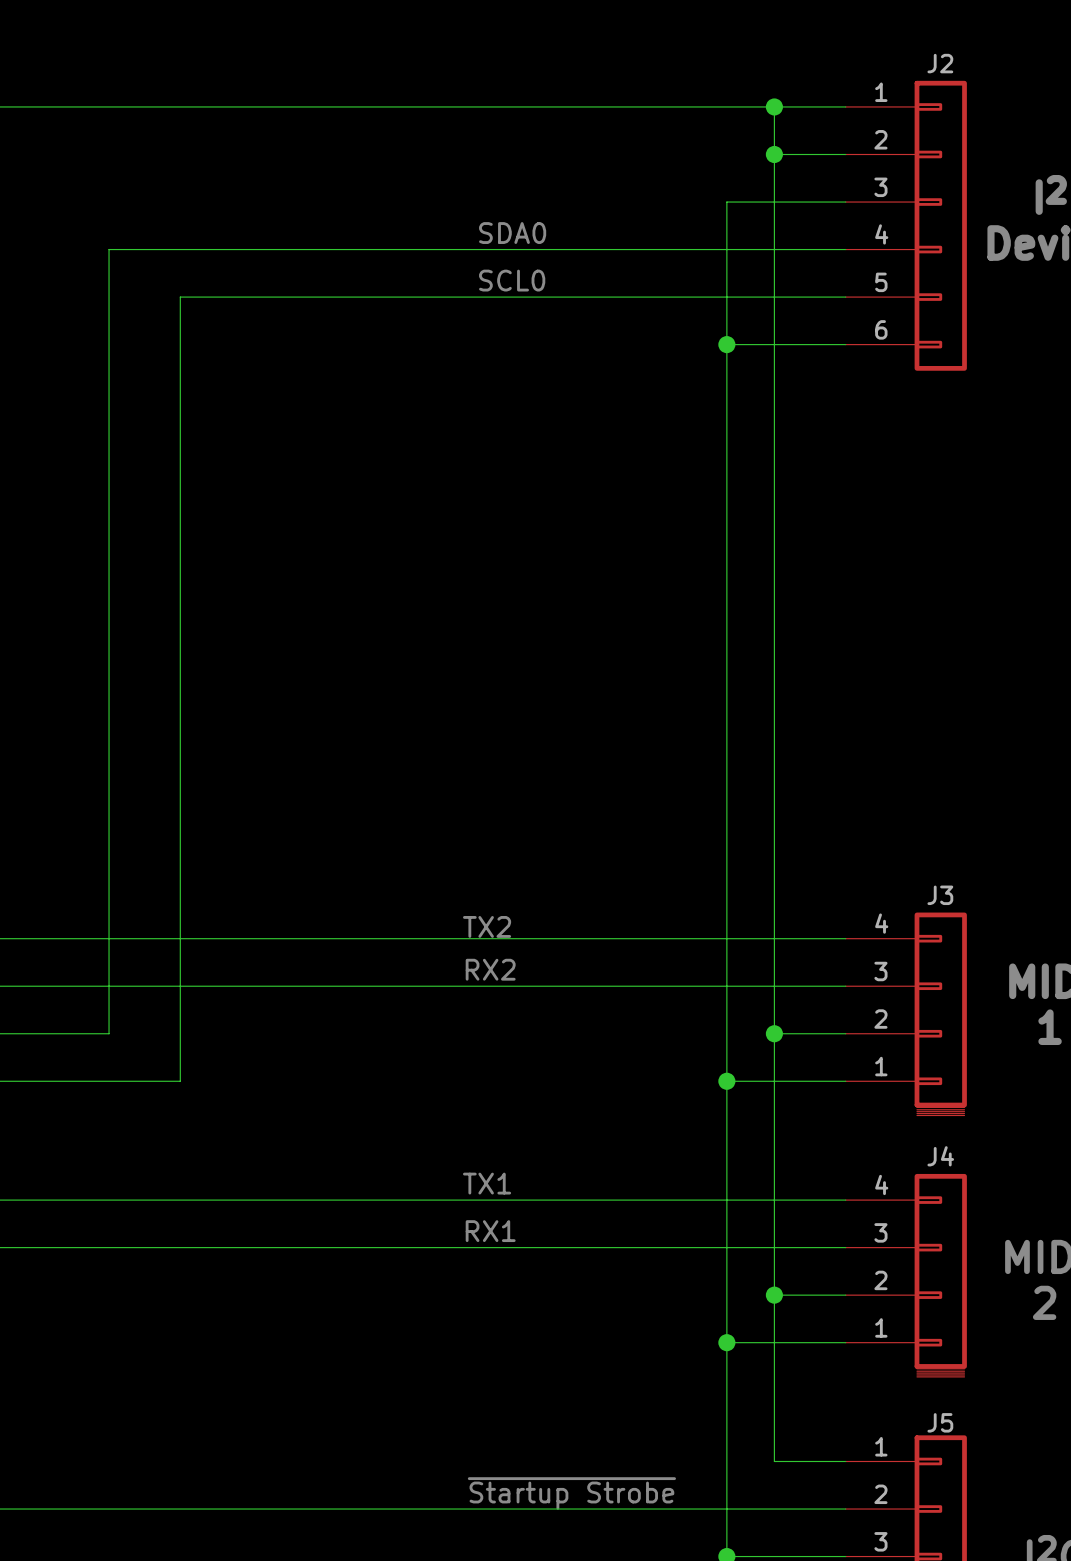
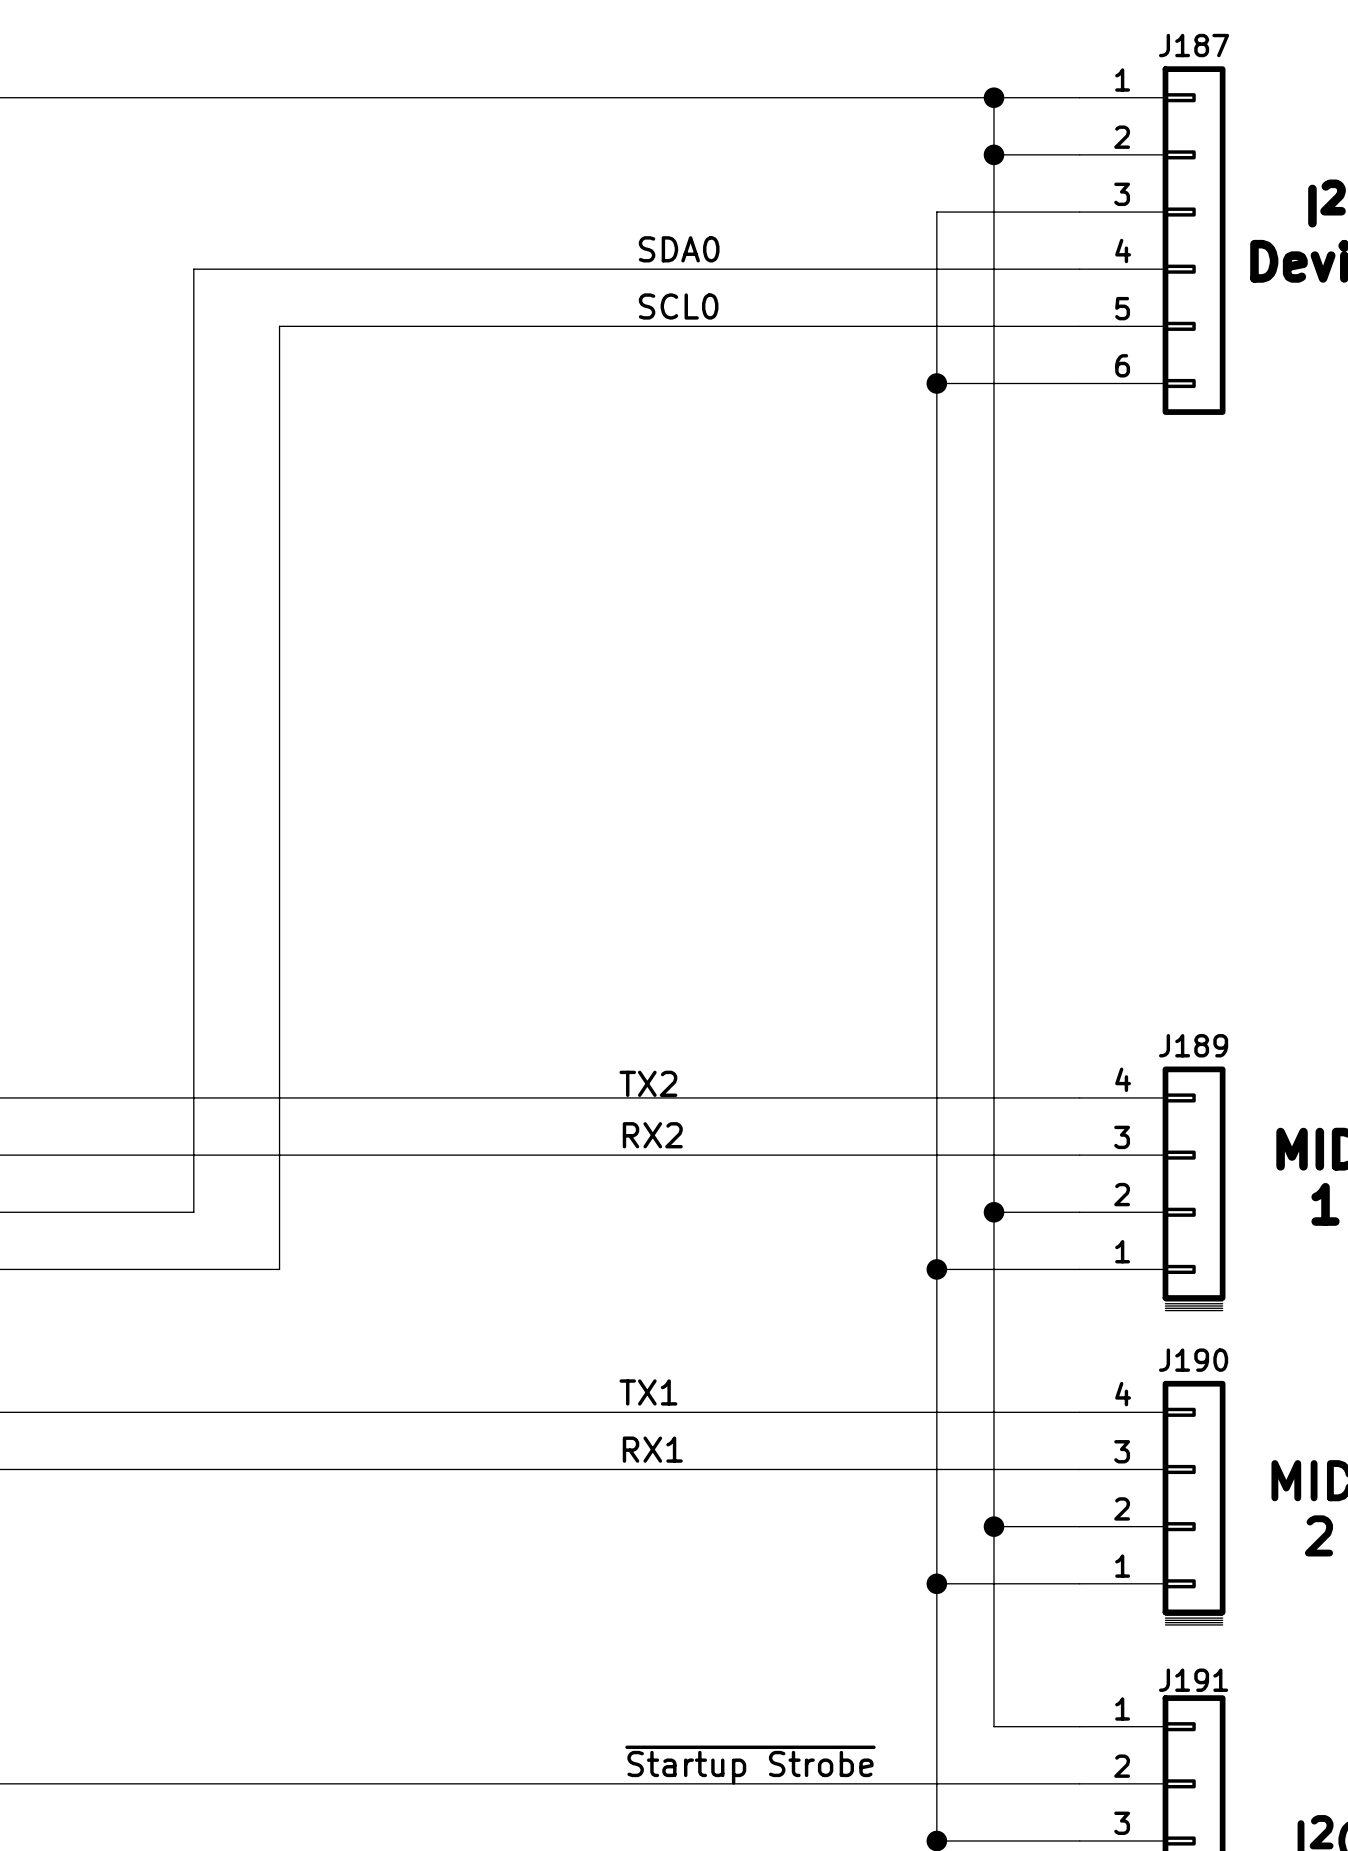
J2 name: J2 (940, 63) -> J187 (1194, 45)
J3 name: J3 (940, 895) -> J189 (1193, 1045)
J4 name: J4 (940, 1156) -> J190 (1193, 1360)
J5 name: J5 (940, 1422) -> J191 (1193, 1680)

